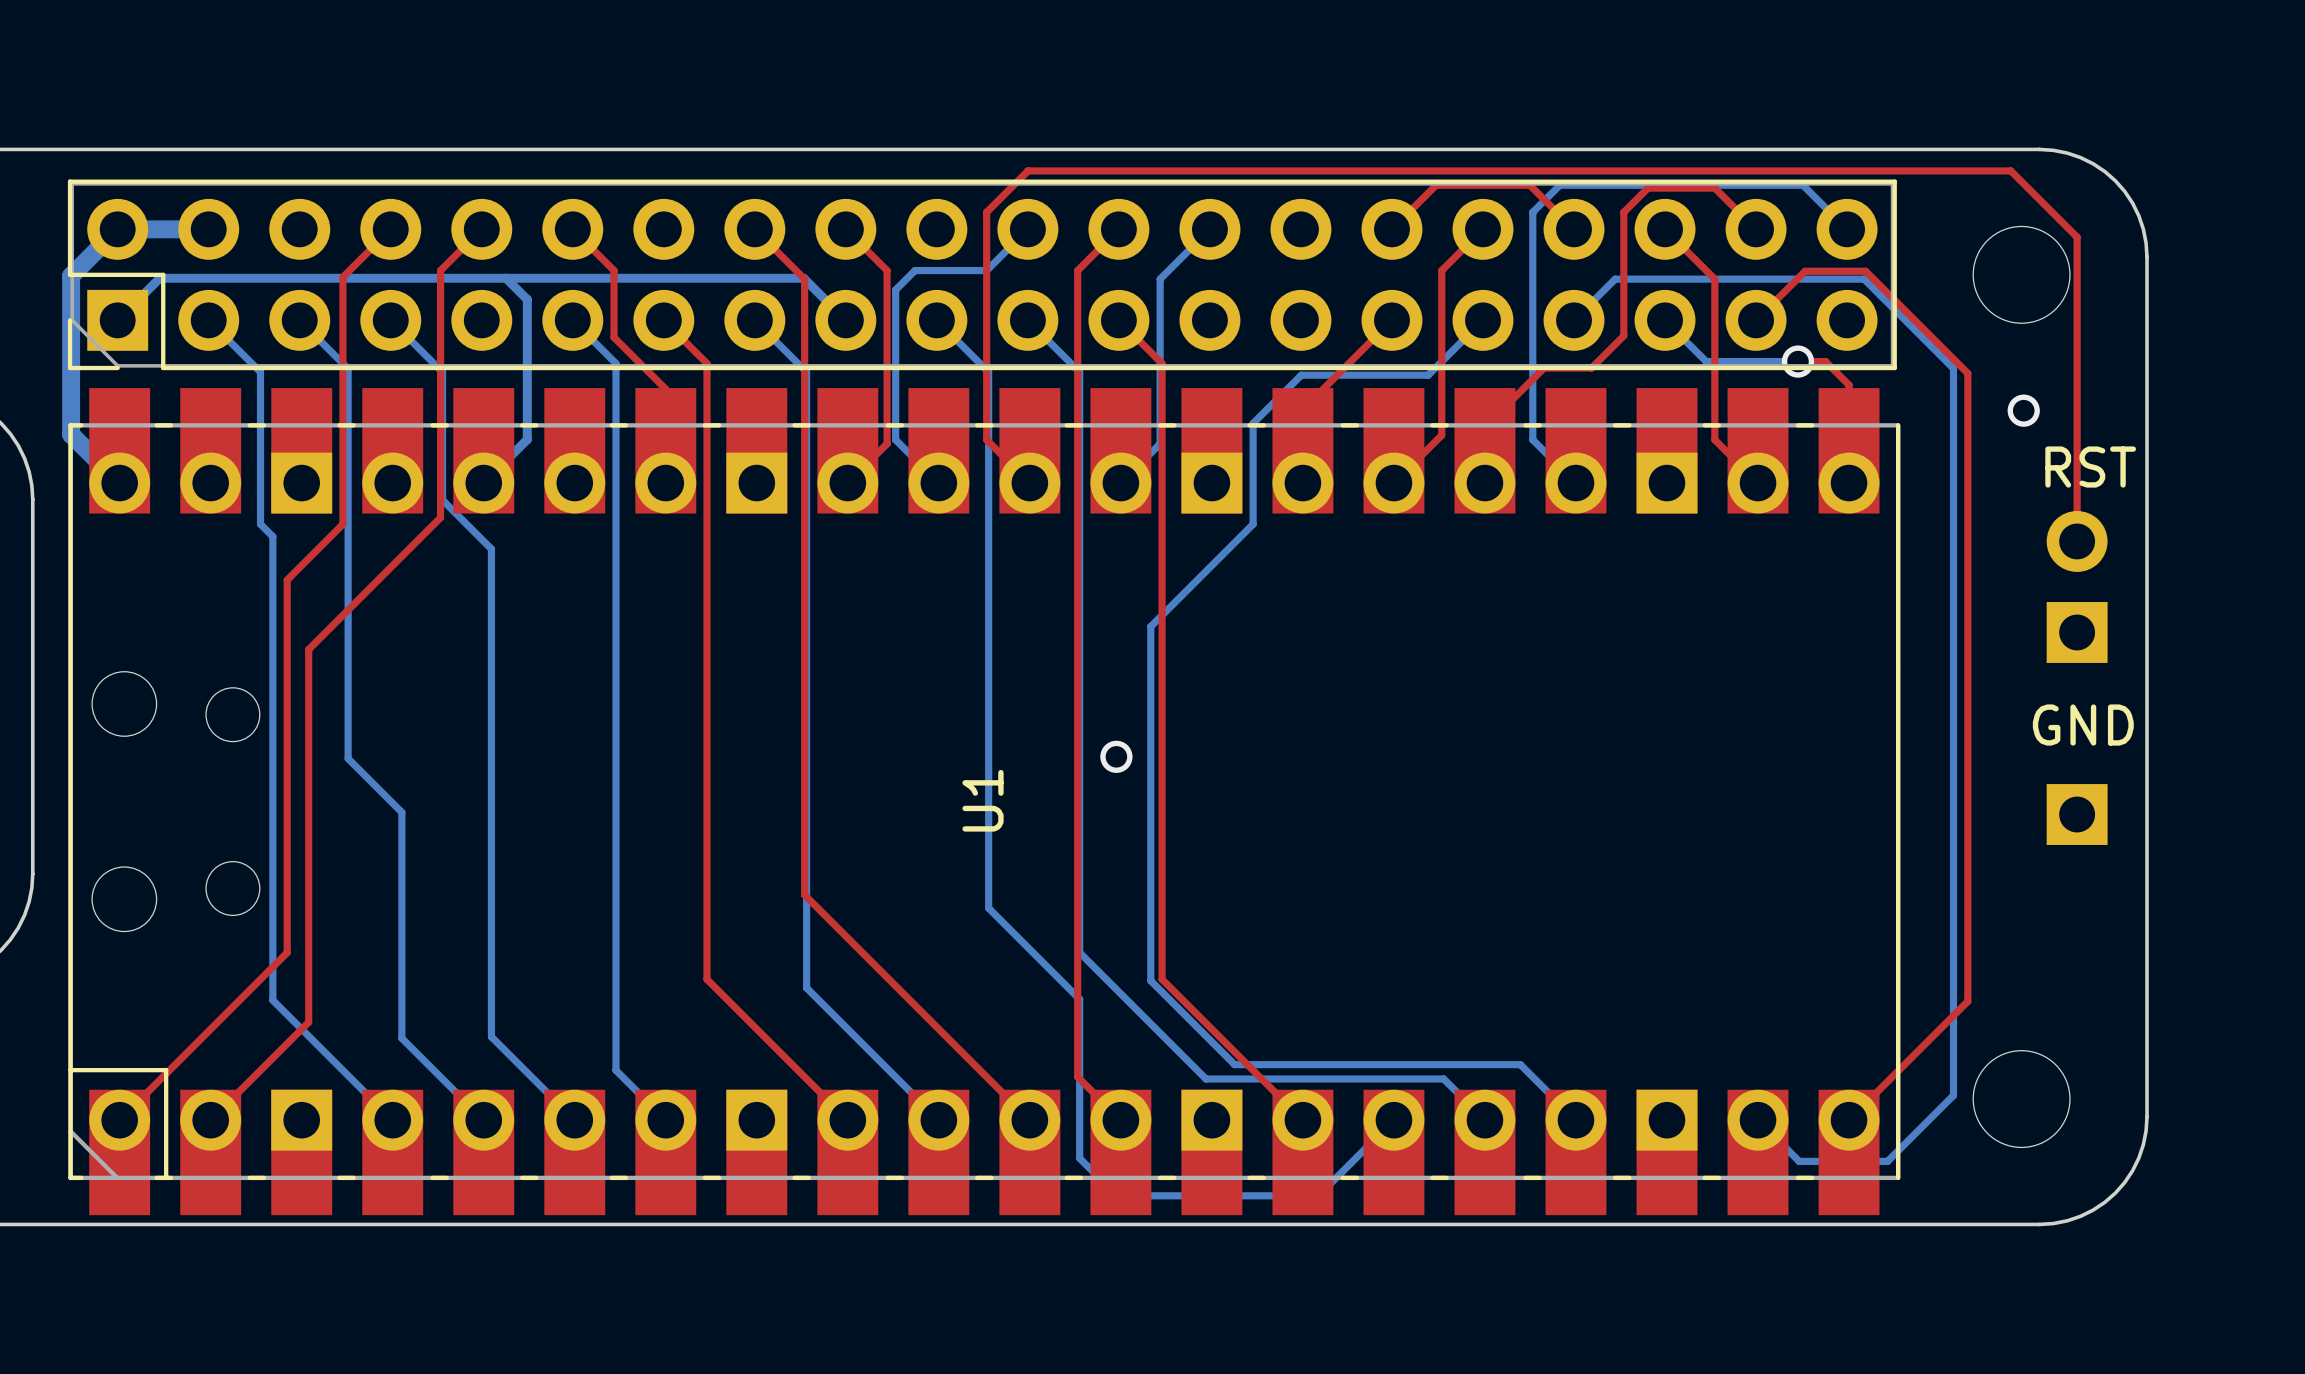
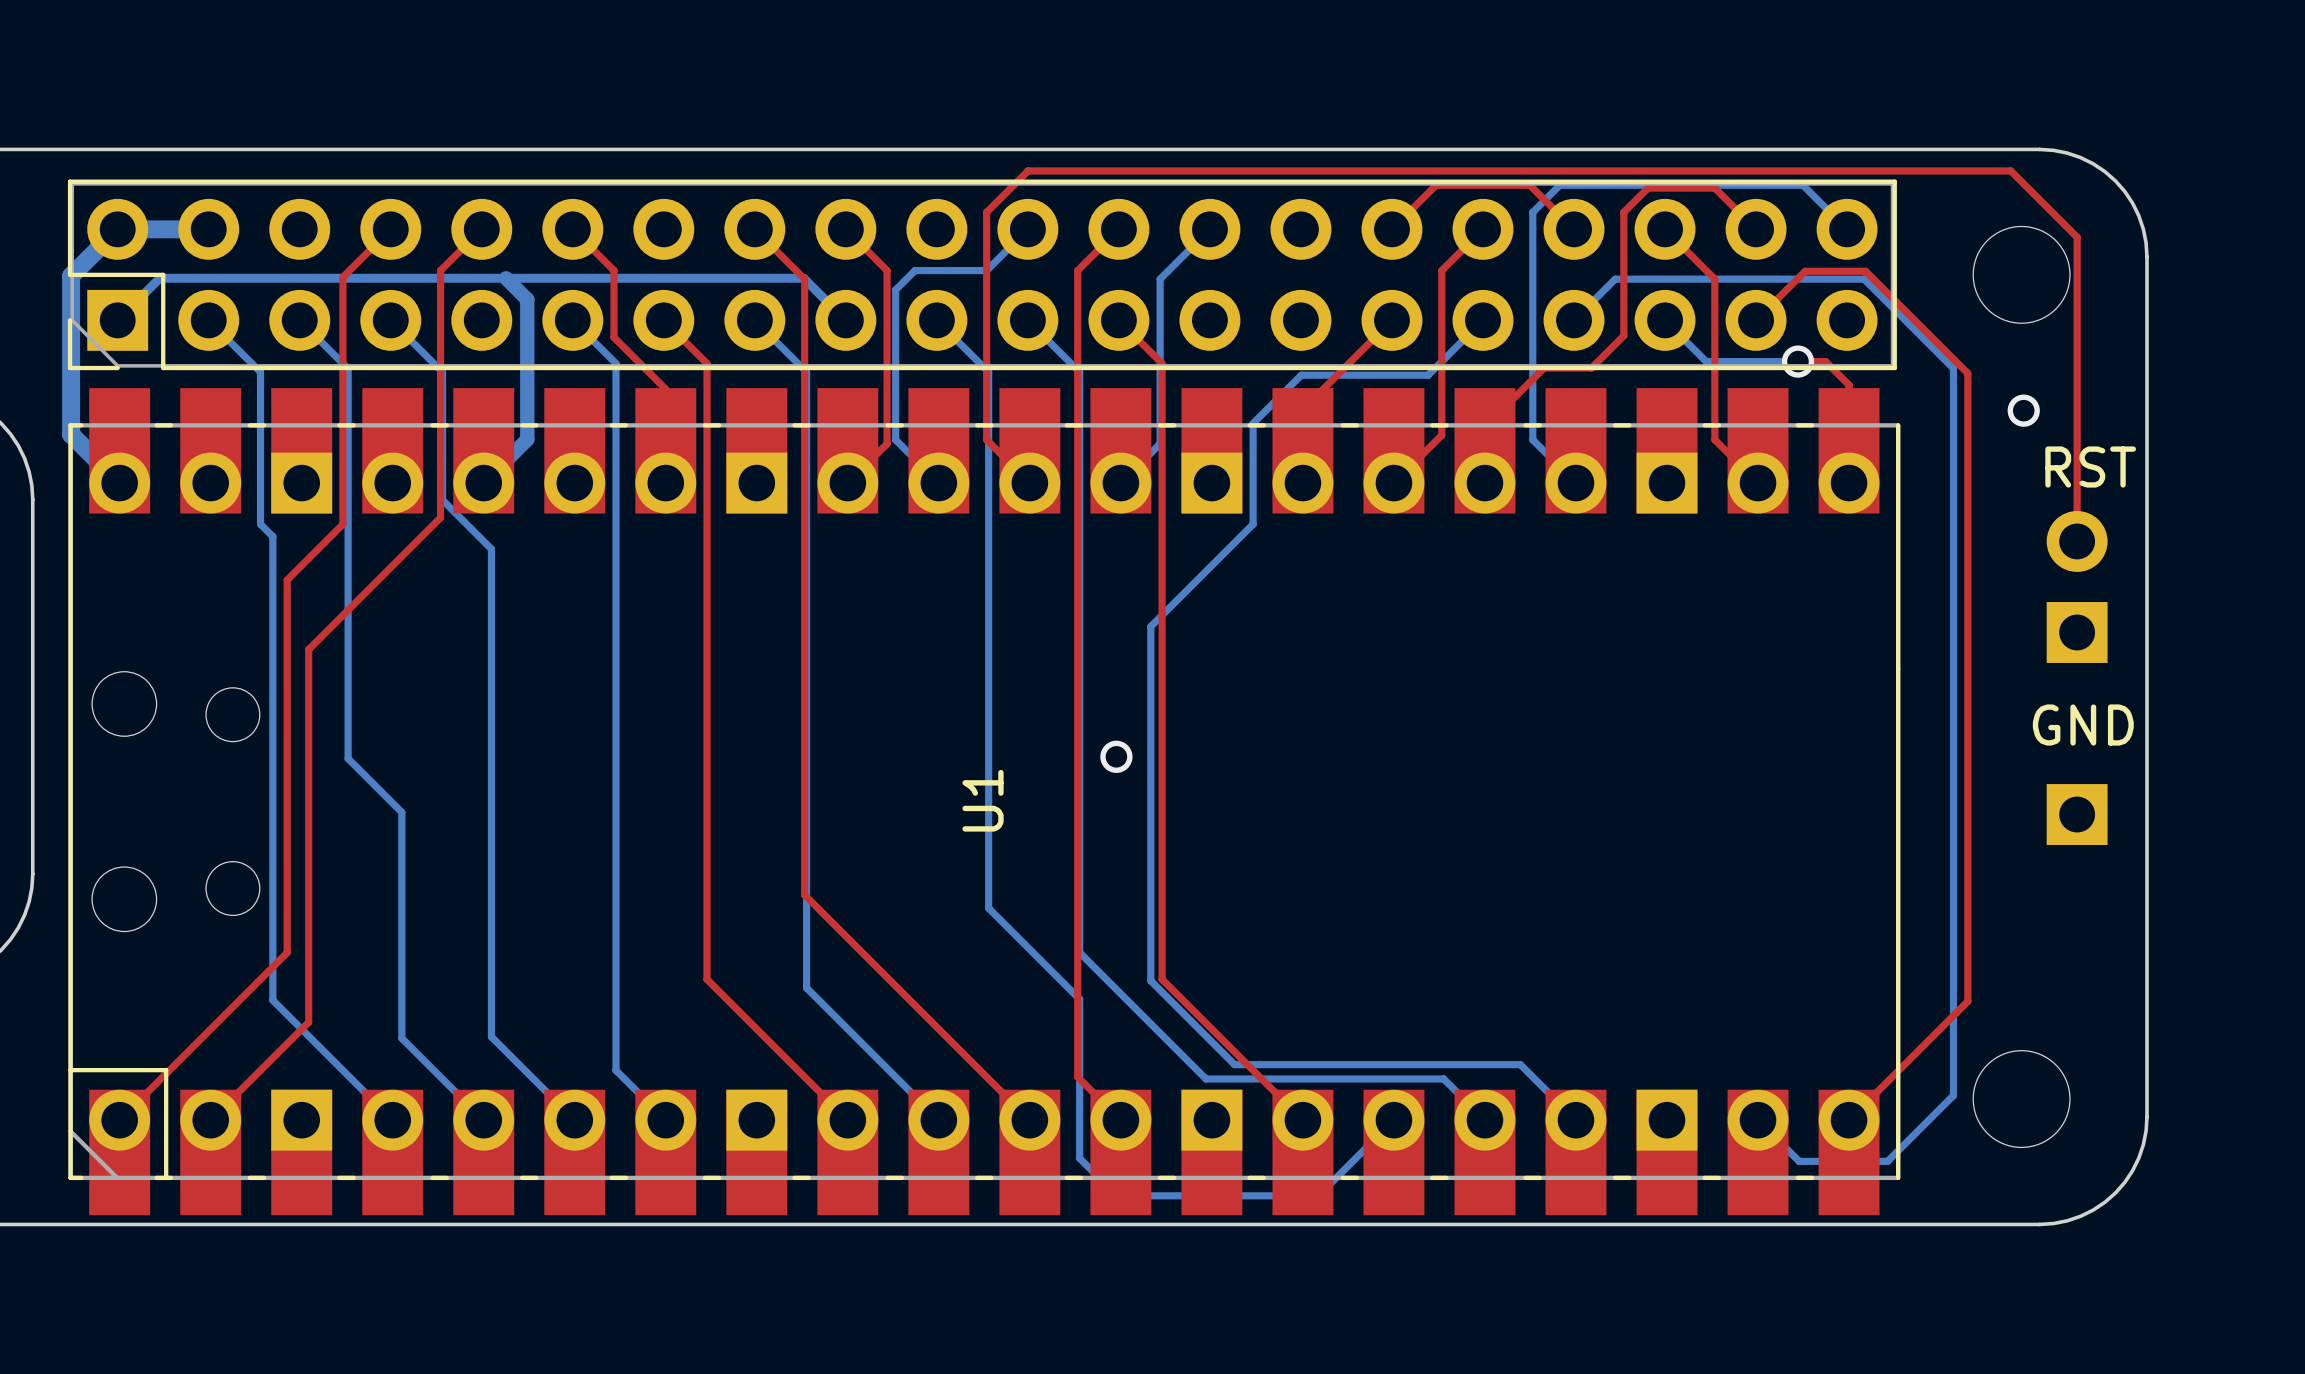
bottom track width: thin (506, 278) (527, 299) (527, 439) (483, 483) -> thick (506, 278) (527, 299) (527, 439) (483, 483)

